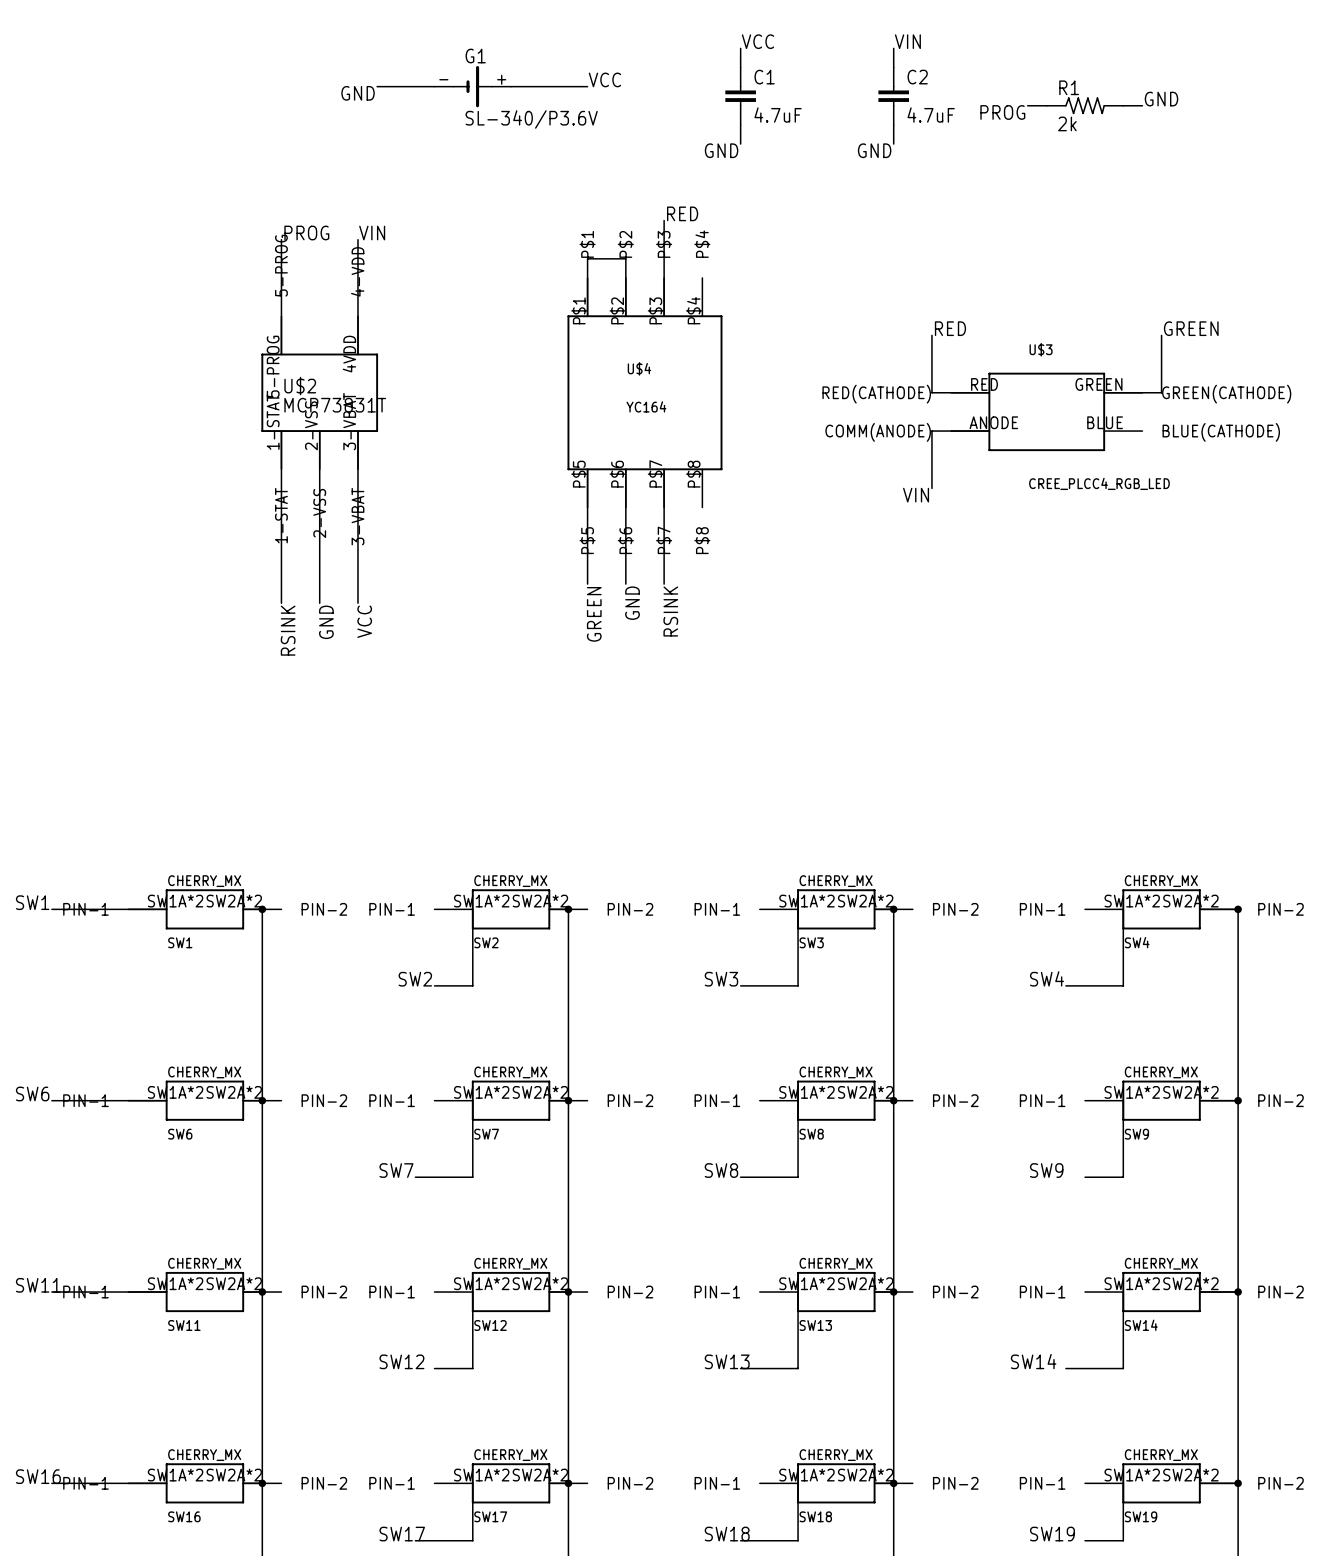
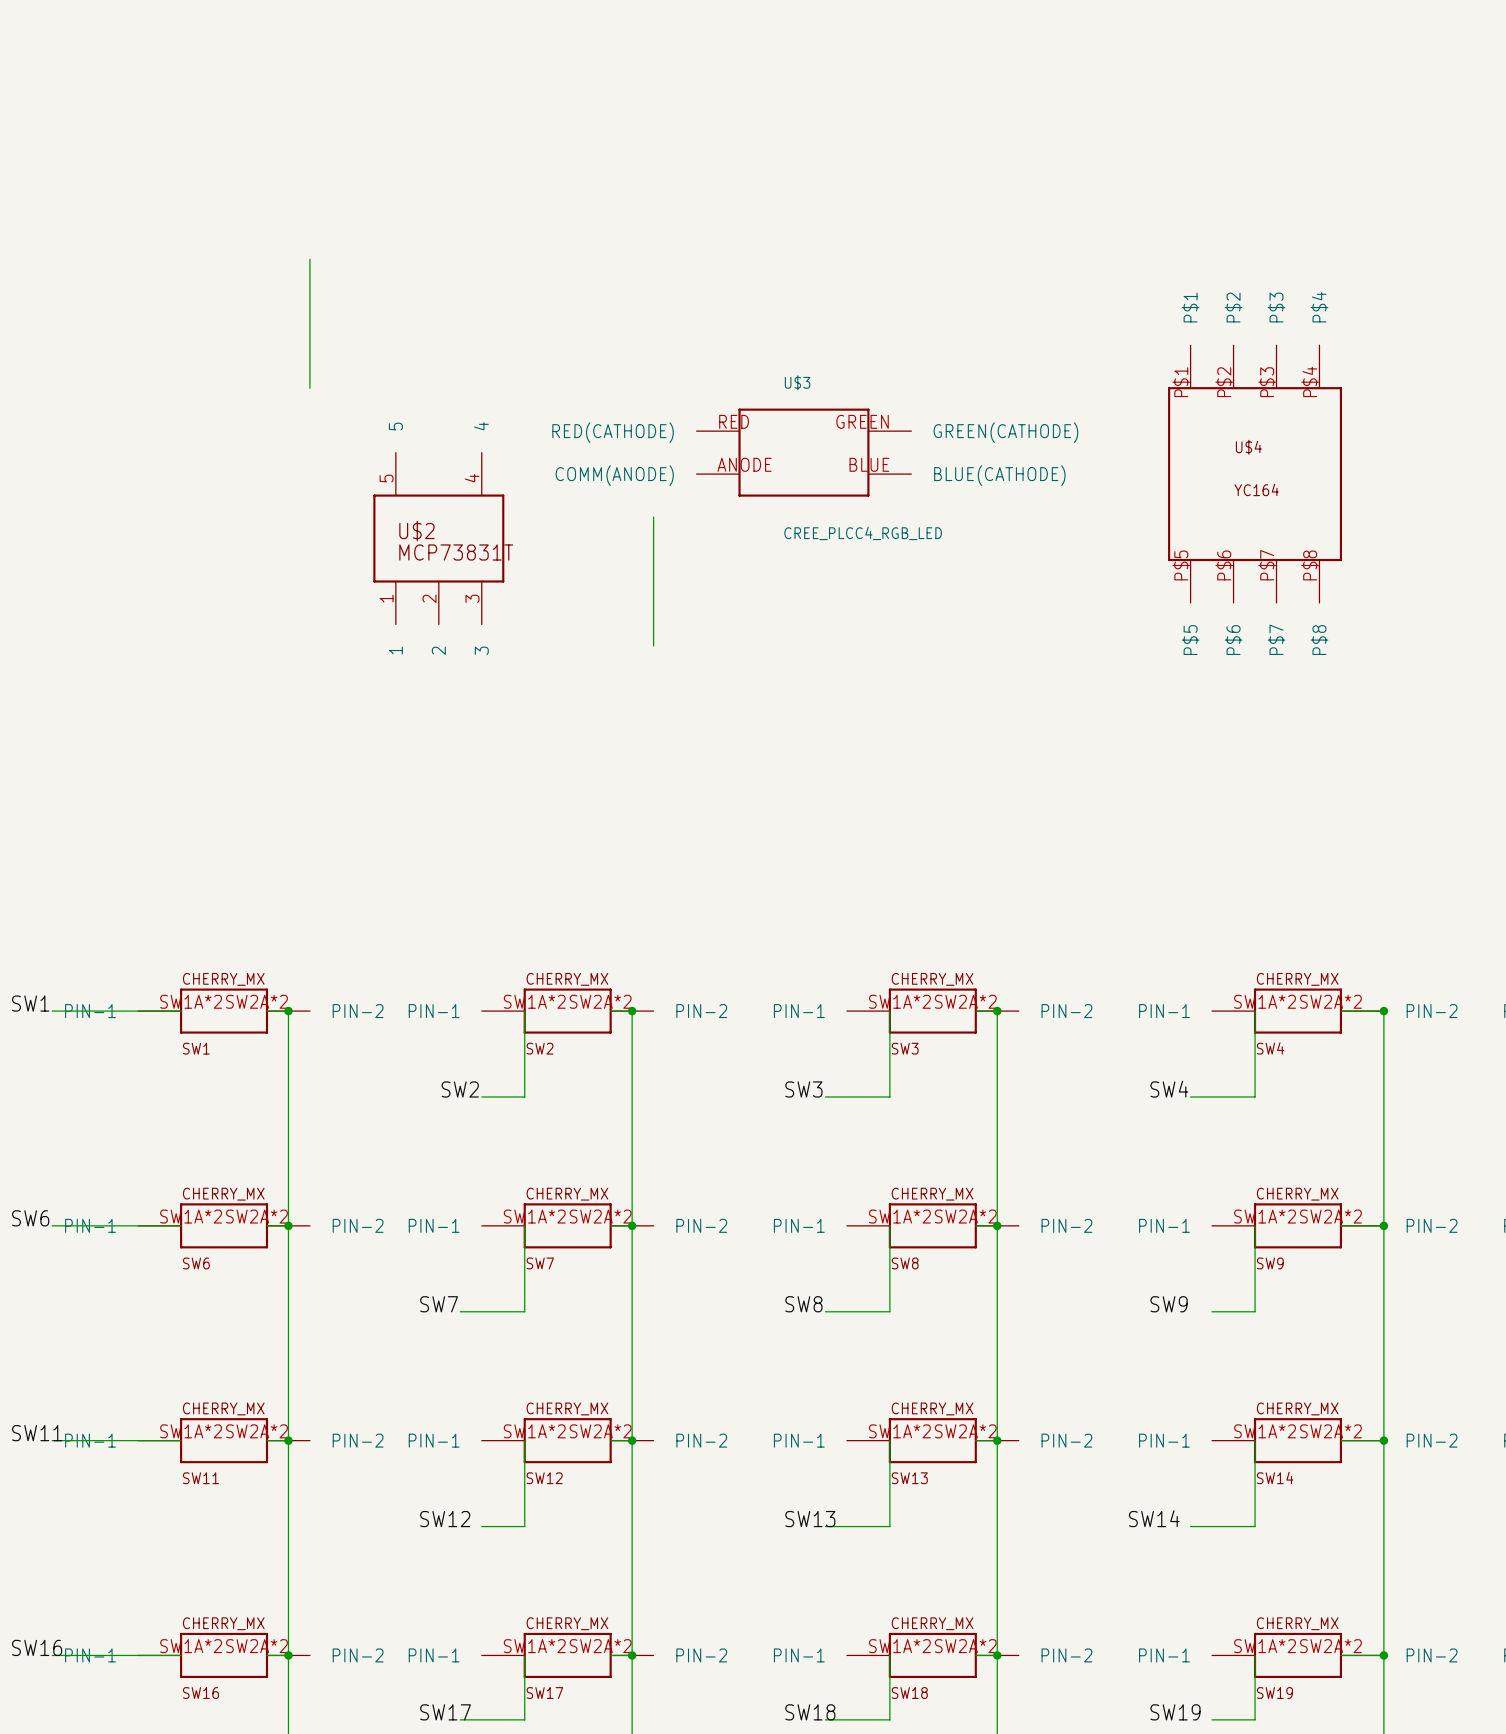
label: VCC (757, 41) -> none
label: VIN (907, 41) -> none
wire: (740, 48) (740, 67) -> none
wire: (893, 48) (893, 67) -> none
label: VCC (604, 79) -> none
wire: (377, 86) (434, 86) -> none
G1: SL-340/P3.6V (472, 86) -> none
wire: (511, 86) (587, 86) -> none
label: GND (358, 93) -> none
C1: 4.7uF (740, 96) -> none
C2: 4.7uF (893, 96) -> none
label: GND (1161, 99) -> none
wire: (1027, 105) (1046, 105) -> none
R1: 2k (1085, 105) -> none
wire: (1123, 105) (1142, 105) -> none
label: PROG (1002, 112) -> none
wire: (740, 124) (740, 144) -> none
wire: (893, 124) (893, 144) -> none
label: GND (721, 150) -> none
label: GND (874, 150) -> none
label: RED (682, 213) -> none
wire: (664, 220) (664, 316) -> none
label: PROG (306, 233) -> none
label: VIN (372, 233) -> none
wire: (357, 239) (357, 354) -> none
U$2 symbol: [261, 316, 379, 470] -> [373, 452, 505, 625]
wire: (587, 316) (587, 258) (625, 258) (625, 316) -> none
label: RED (950, 328) -> none
label: GREEN (1191, 328) -> none
wire: (931, 335) (931, 392) (989, 392) -> none
wire: (1161, 335) (1161, 392) (1104, 392) -> none
U$4 position: (644, 392) -> (1255, 474)
U$3 position: (1046, 411) -> (803, 452)
wire: (281, 431) (281, 603) -> none
wire: (319, 431) (319, 603) -> none
wire: (357, 431) (357, 603) -> none
wire: (989, 431) (931, 431) (931, 488) -> none
wire: (625, 469) (625, 584) -> none
wire: (664, 469) (664, 584) -> none
label: VIN (916, 495) -> none
label: GND (632, 603) -> none
label: RSINK (670, 611) -> none
label: GREEN (594, 614) -> none
label: VCC (364, 621) -> none
label: GND (326, 622) -> none
label: RSINK (288, 630) -> none

